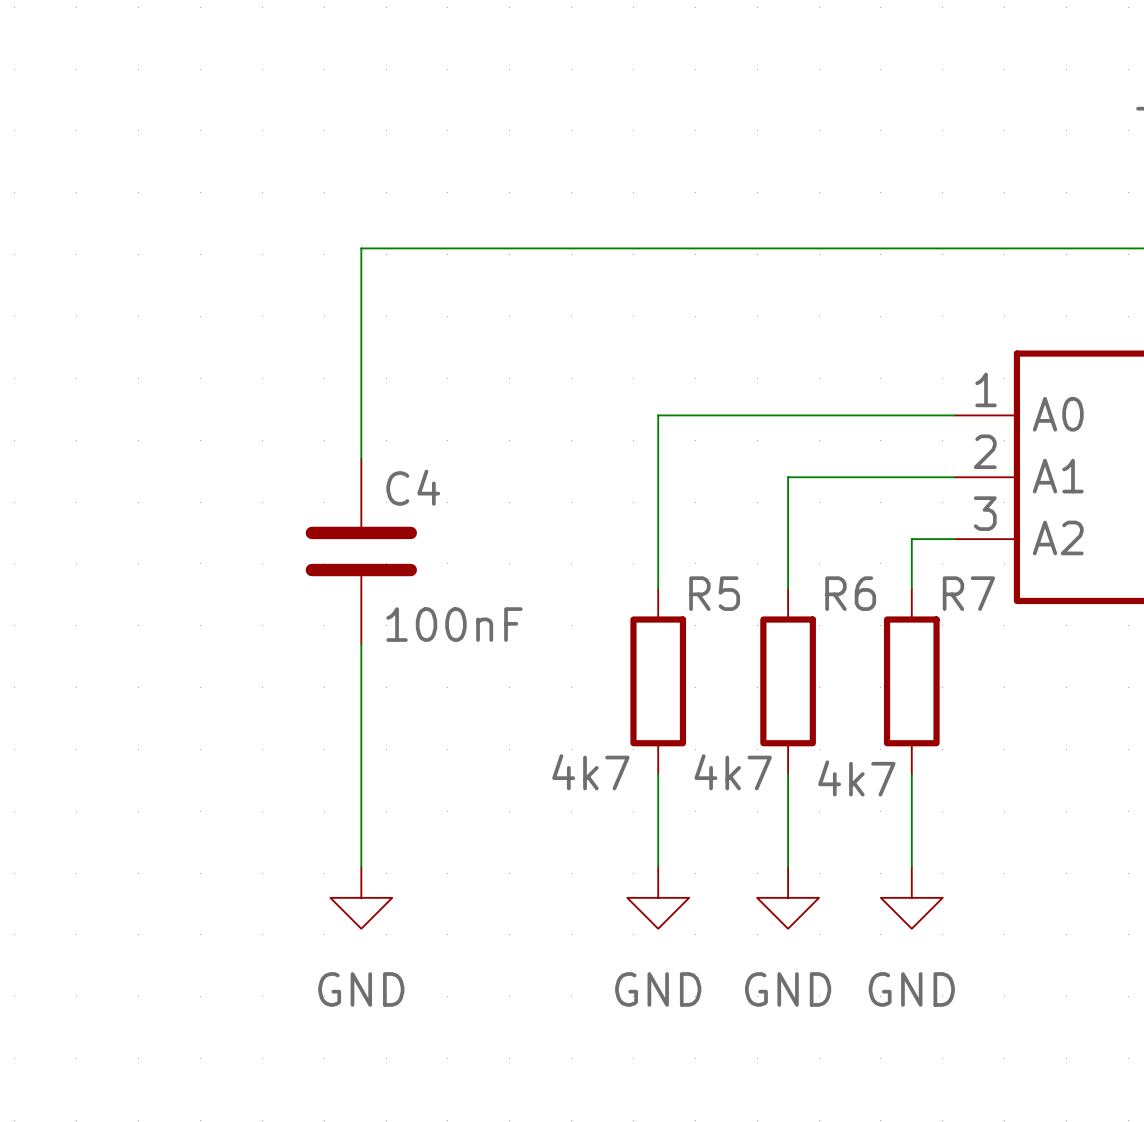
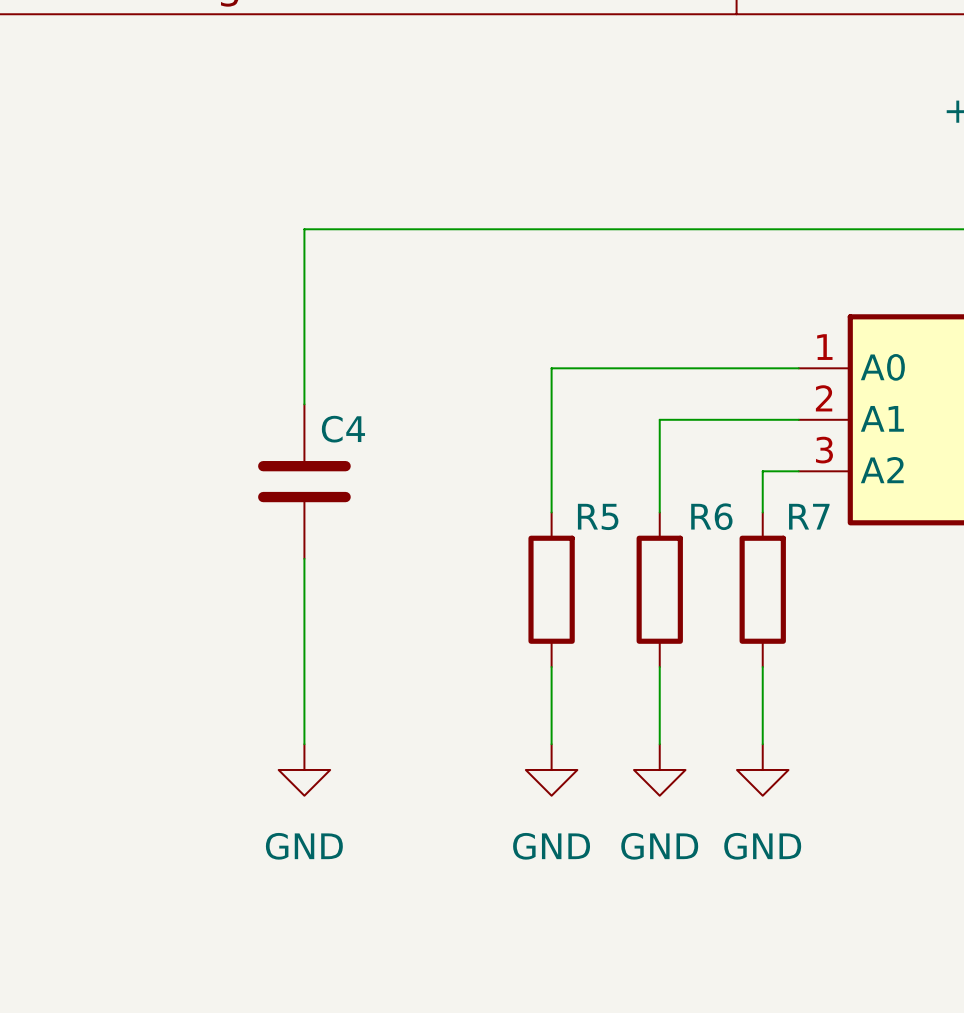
C4 value: 100nF (454, 624) -> none
R5 value: 4k7 (590, 772) -> none
R6 value: 4k7 (733, 772) -> none
R7 value: 4k7 (856, 778) -> none

